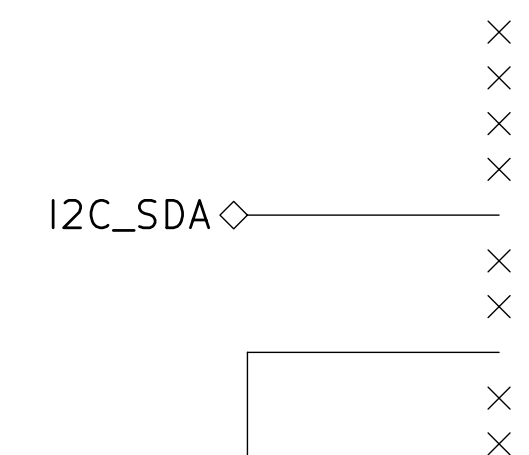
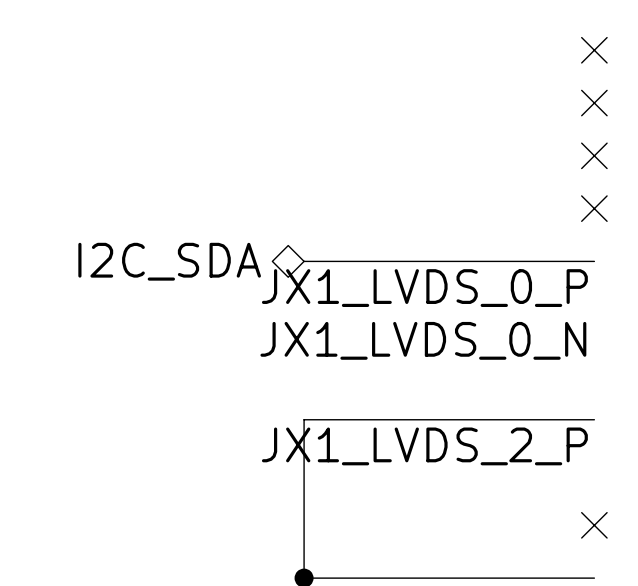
label: none -> JX1_LVDS_0_P (424, 288)
no-connect mark: (499, 260) -> none
label: none -> JX1_LVDS_0_N (423, 340)
no-connect mark: (499, 306) -> none
label: none -> JX1_LVDS_2_P (424, 446)
no-connect mark: (499, 398) -> none

